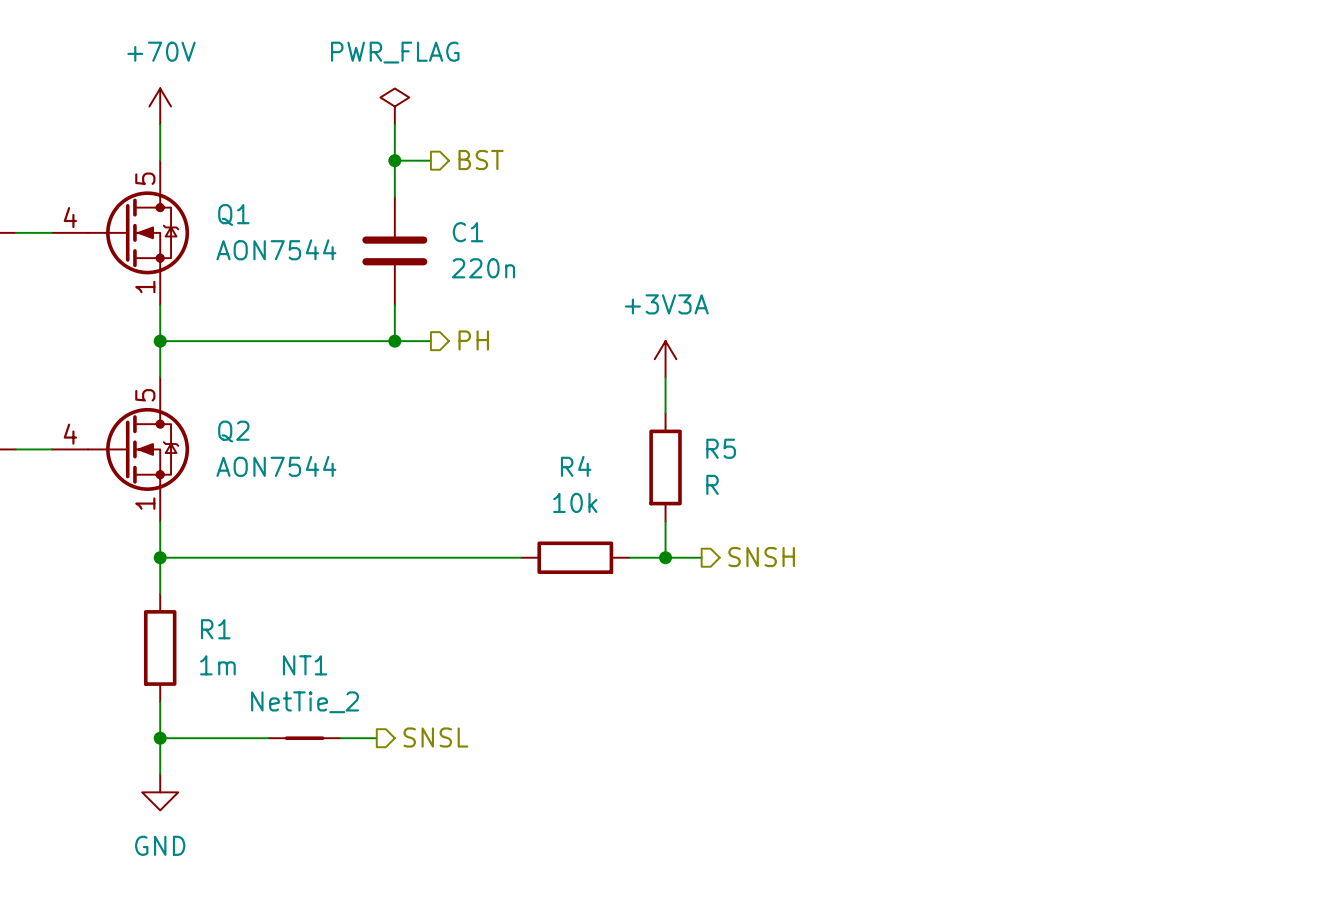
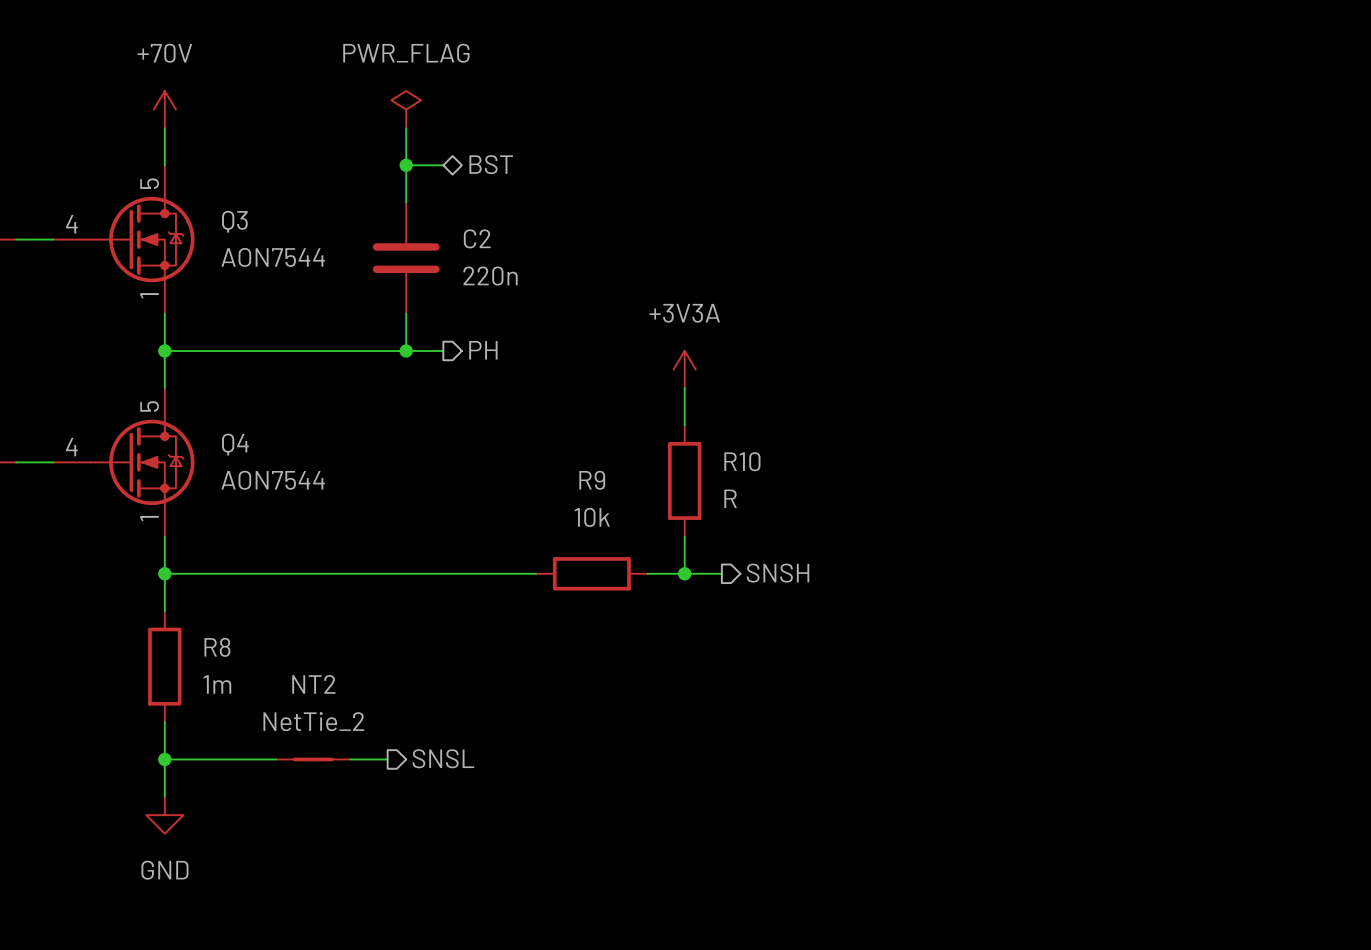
hierarchical label shape: output (481, 160) -> bidirectional (491, 164)
Q1 name: Q1 (233, 215) -> Q3 (234, 221)
C1 name: C1 (468, 232) -> C2 (477, 238)
Q2 name: Q2 (233, 431) -> Q4 (235, 444)
R5 name: R5 (721, 448) -> R10 (742, 461)
R4 name: R4 (576, 466) -> R9 (592, 480)
R1 name: R1 (215, 629) -> R8 (217, 647)
NT1 name: NT1 (305, 665) -> NT2 (313, 684)

